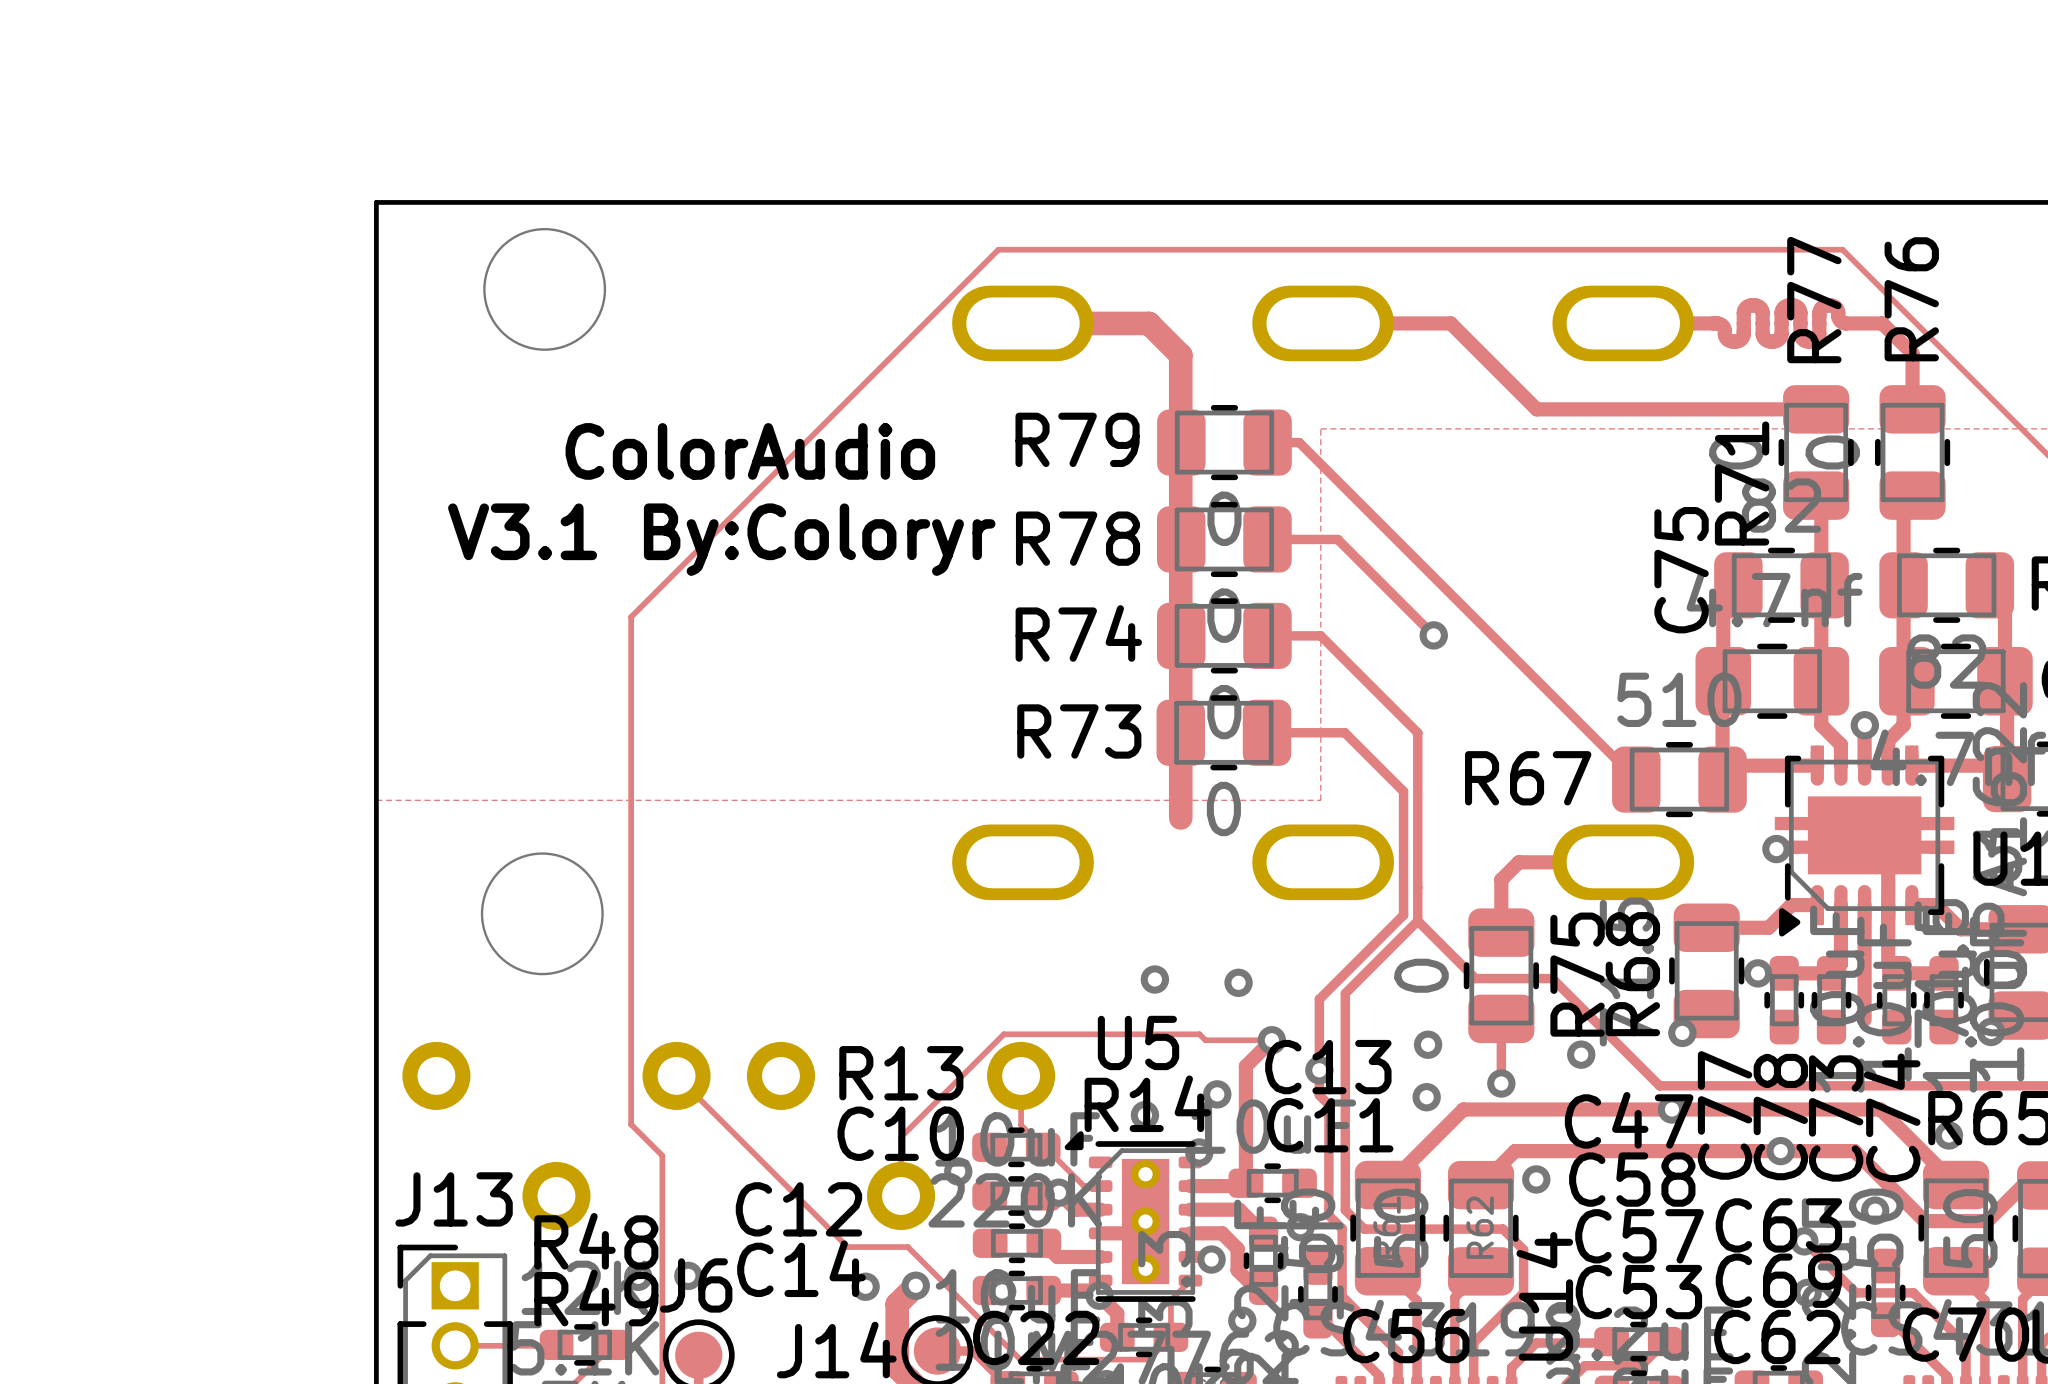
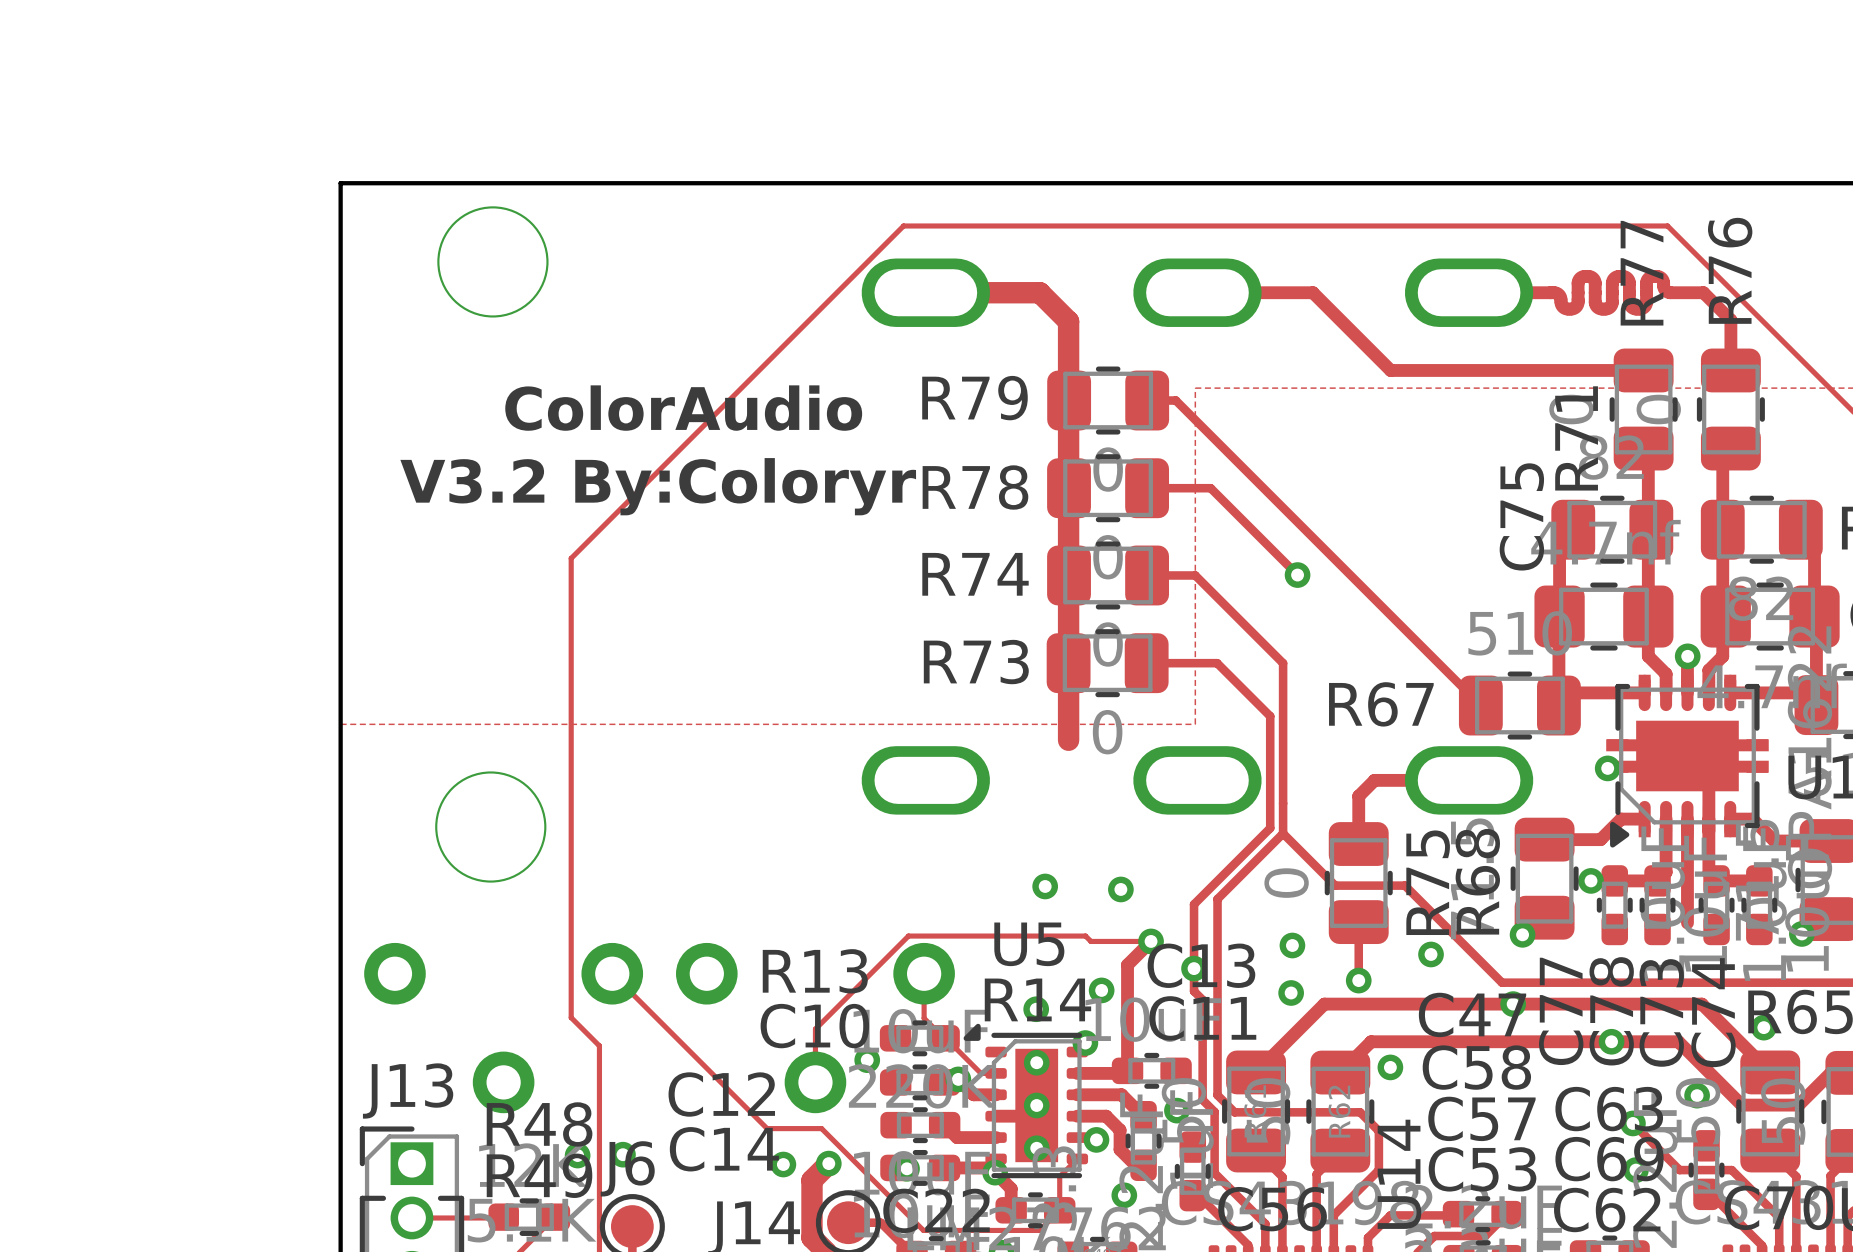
text: V3.1 By:Coloryr (721, 539) -> V3.2 By:Coloryr (658, 486)

